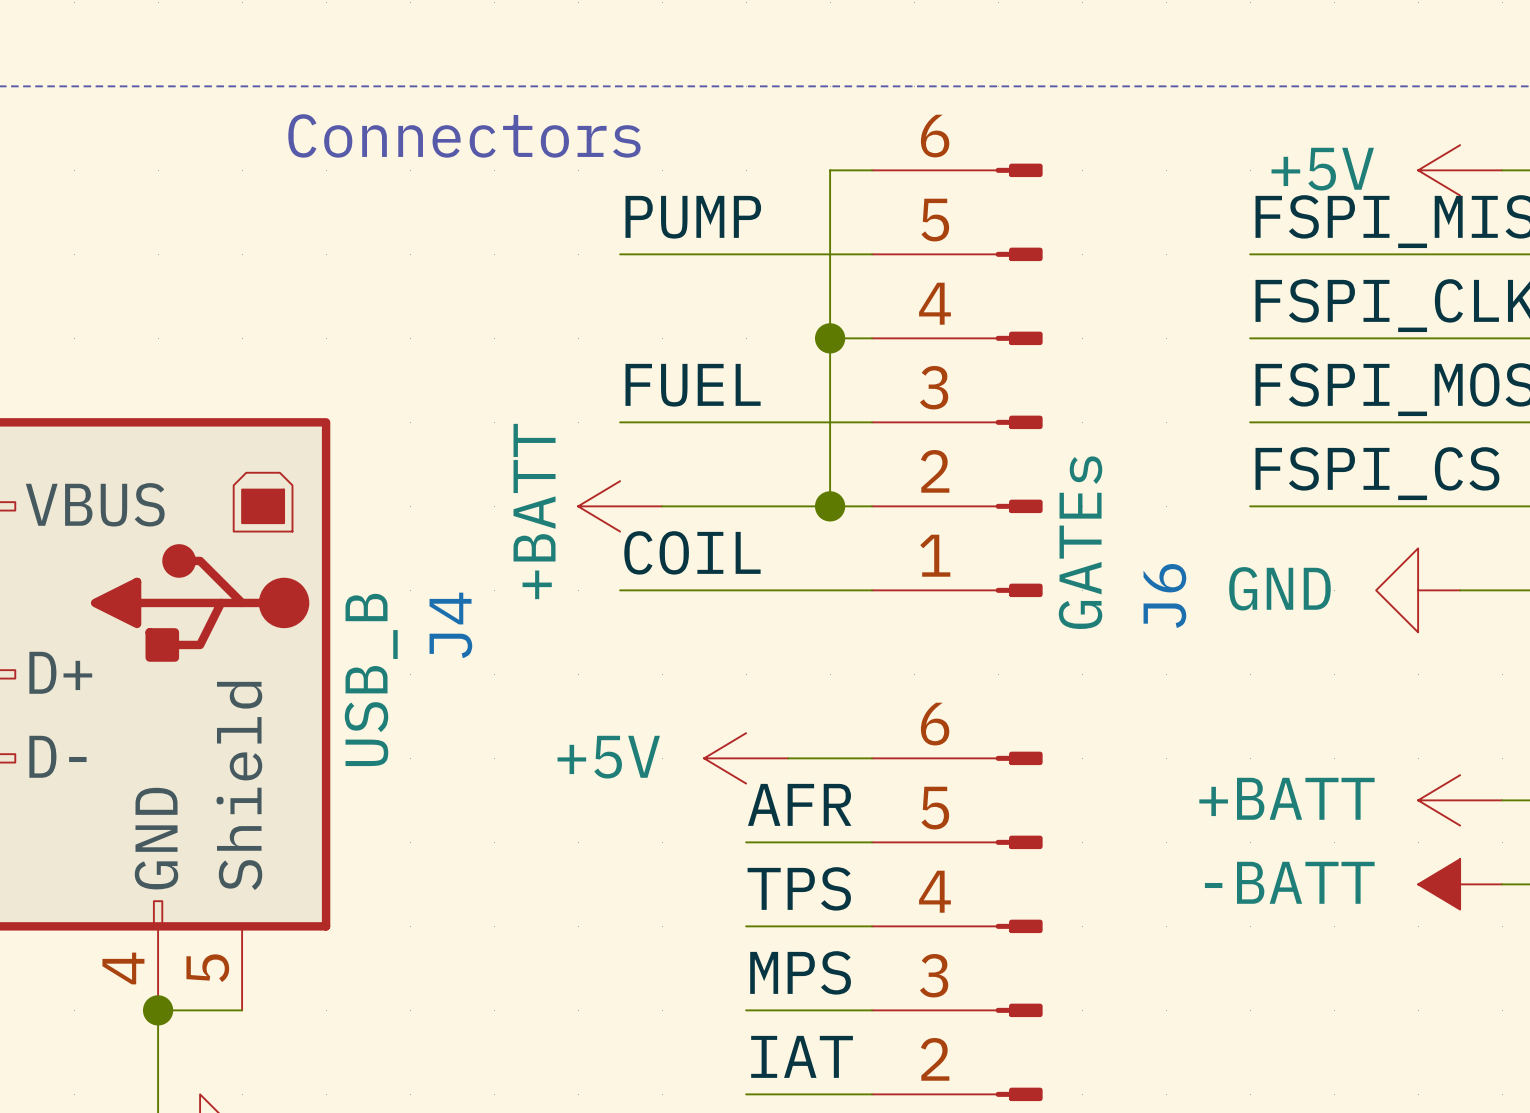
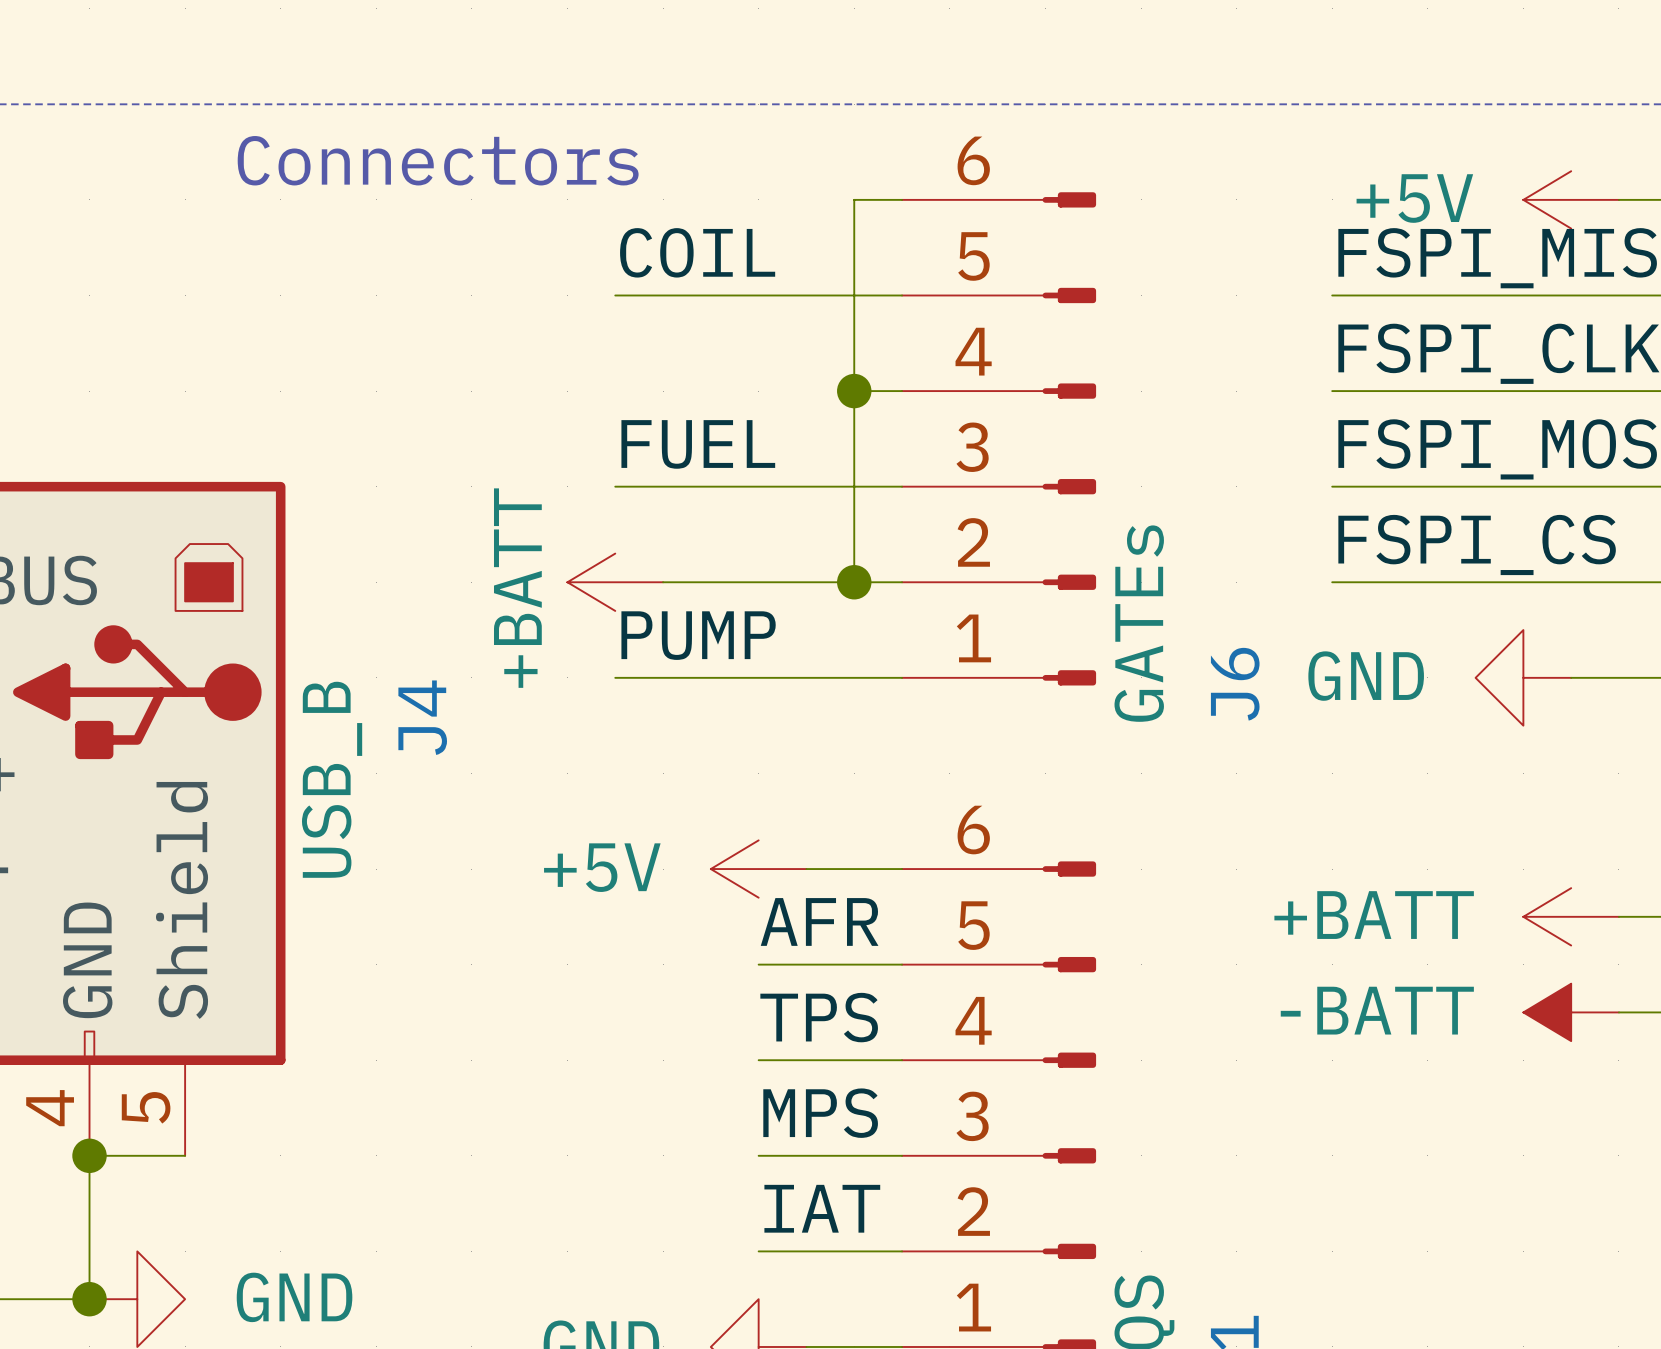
label: PUMP (693, 217) -> COIL (697, 252)
label: COIL (692, 552) -> PUMP (698, 635)

